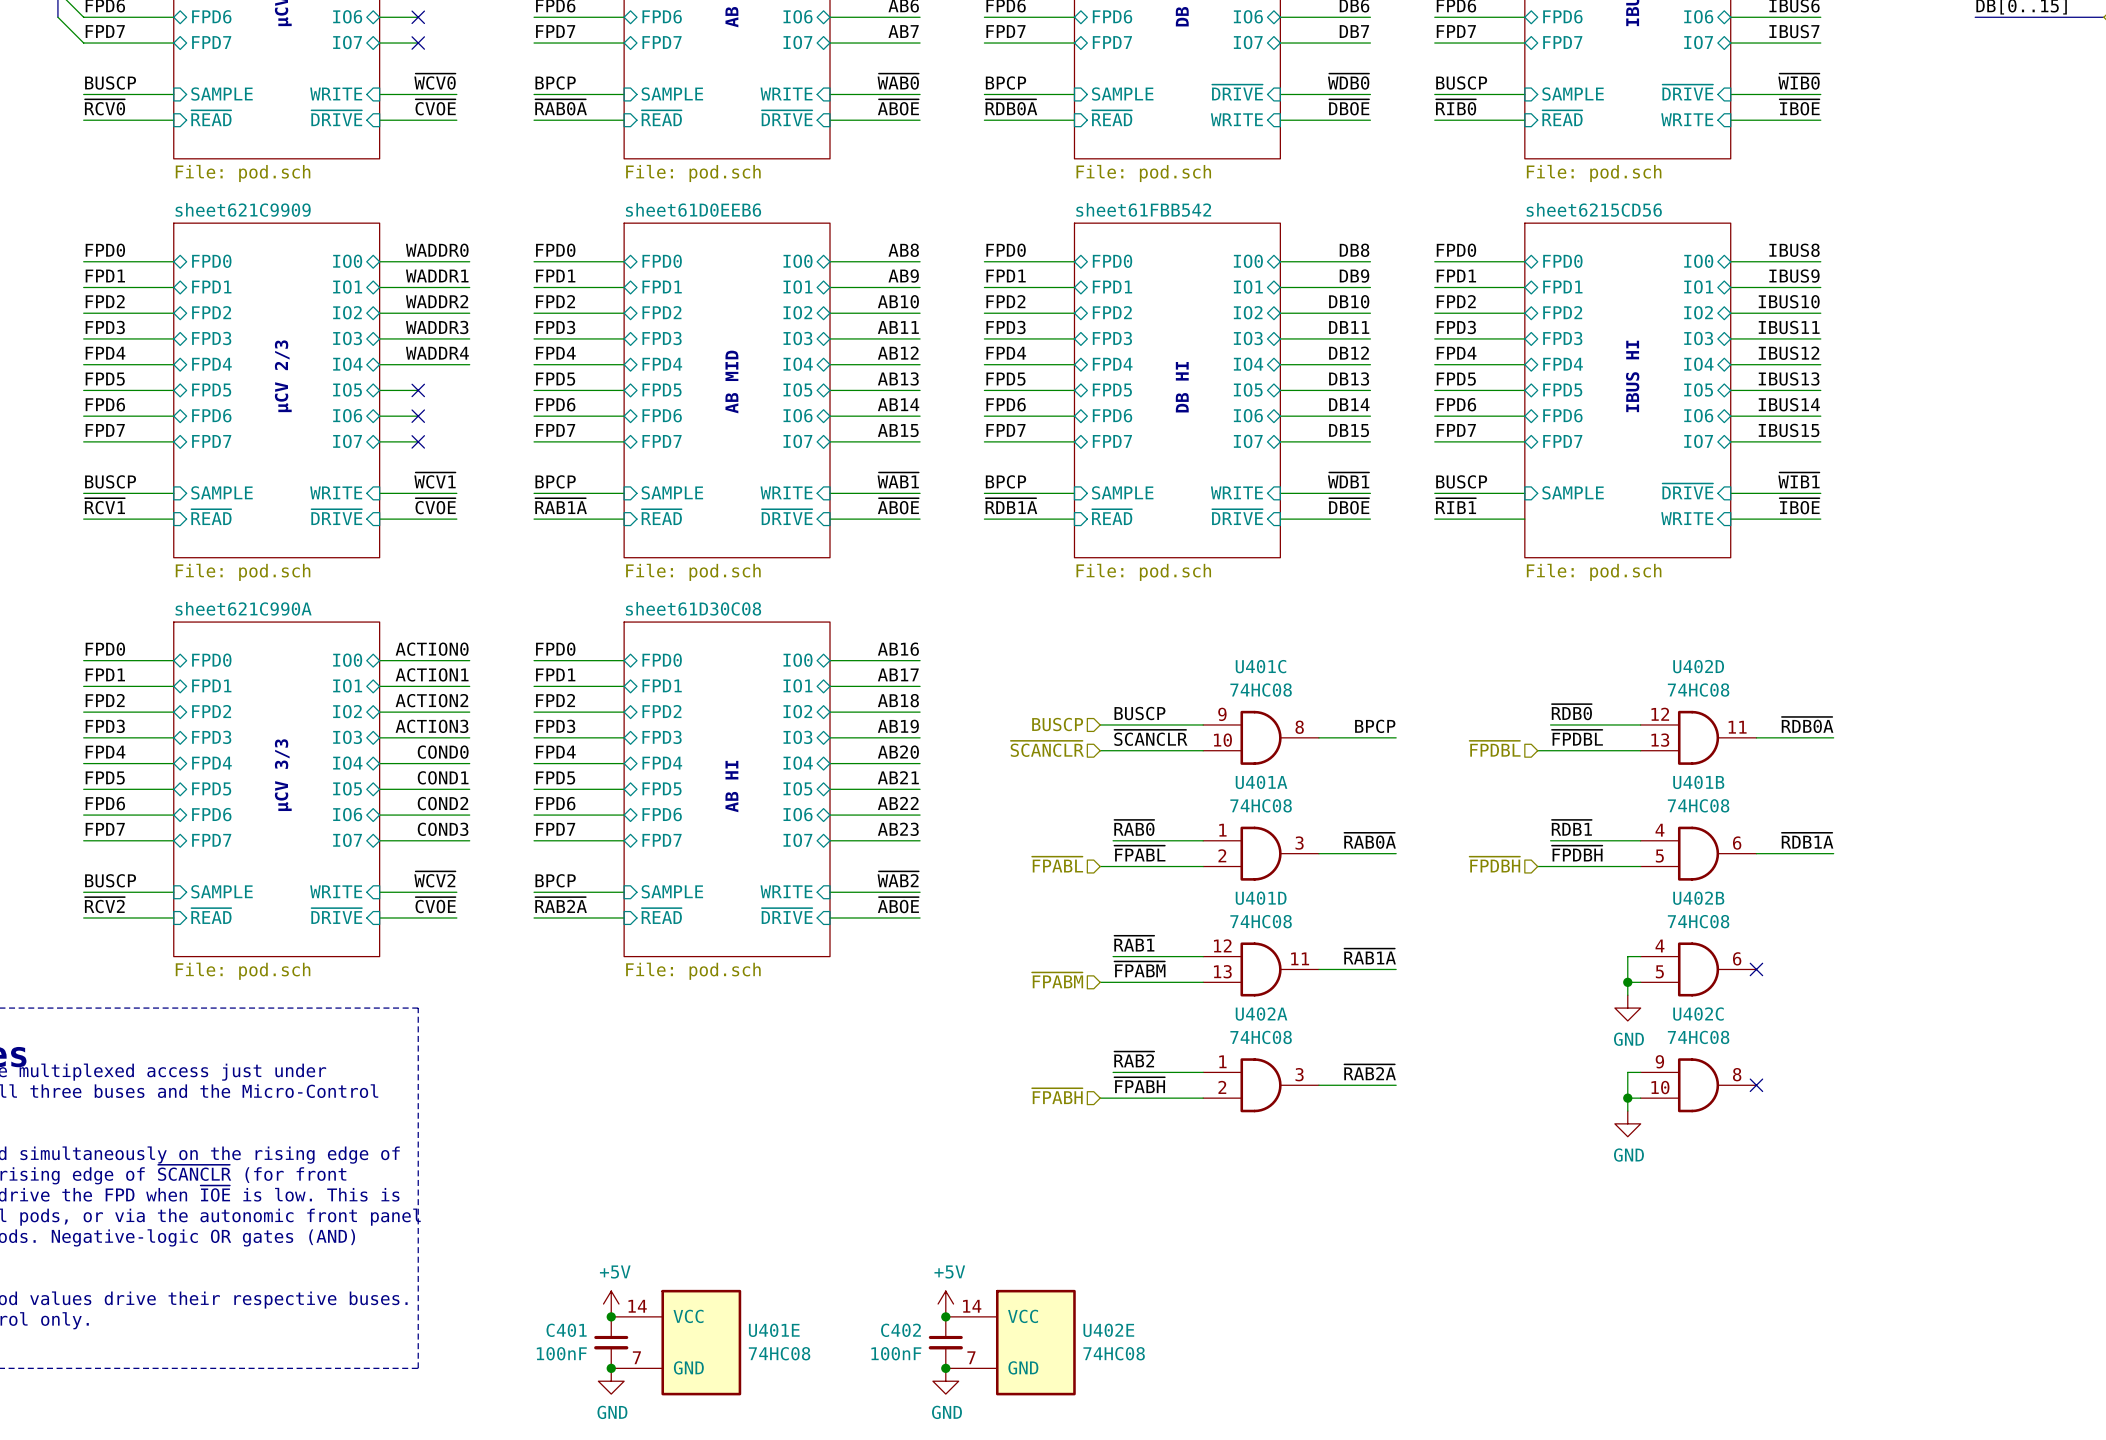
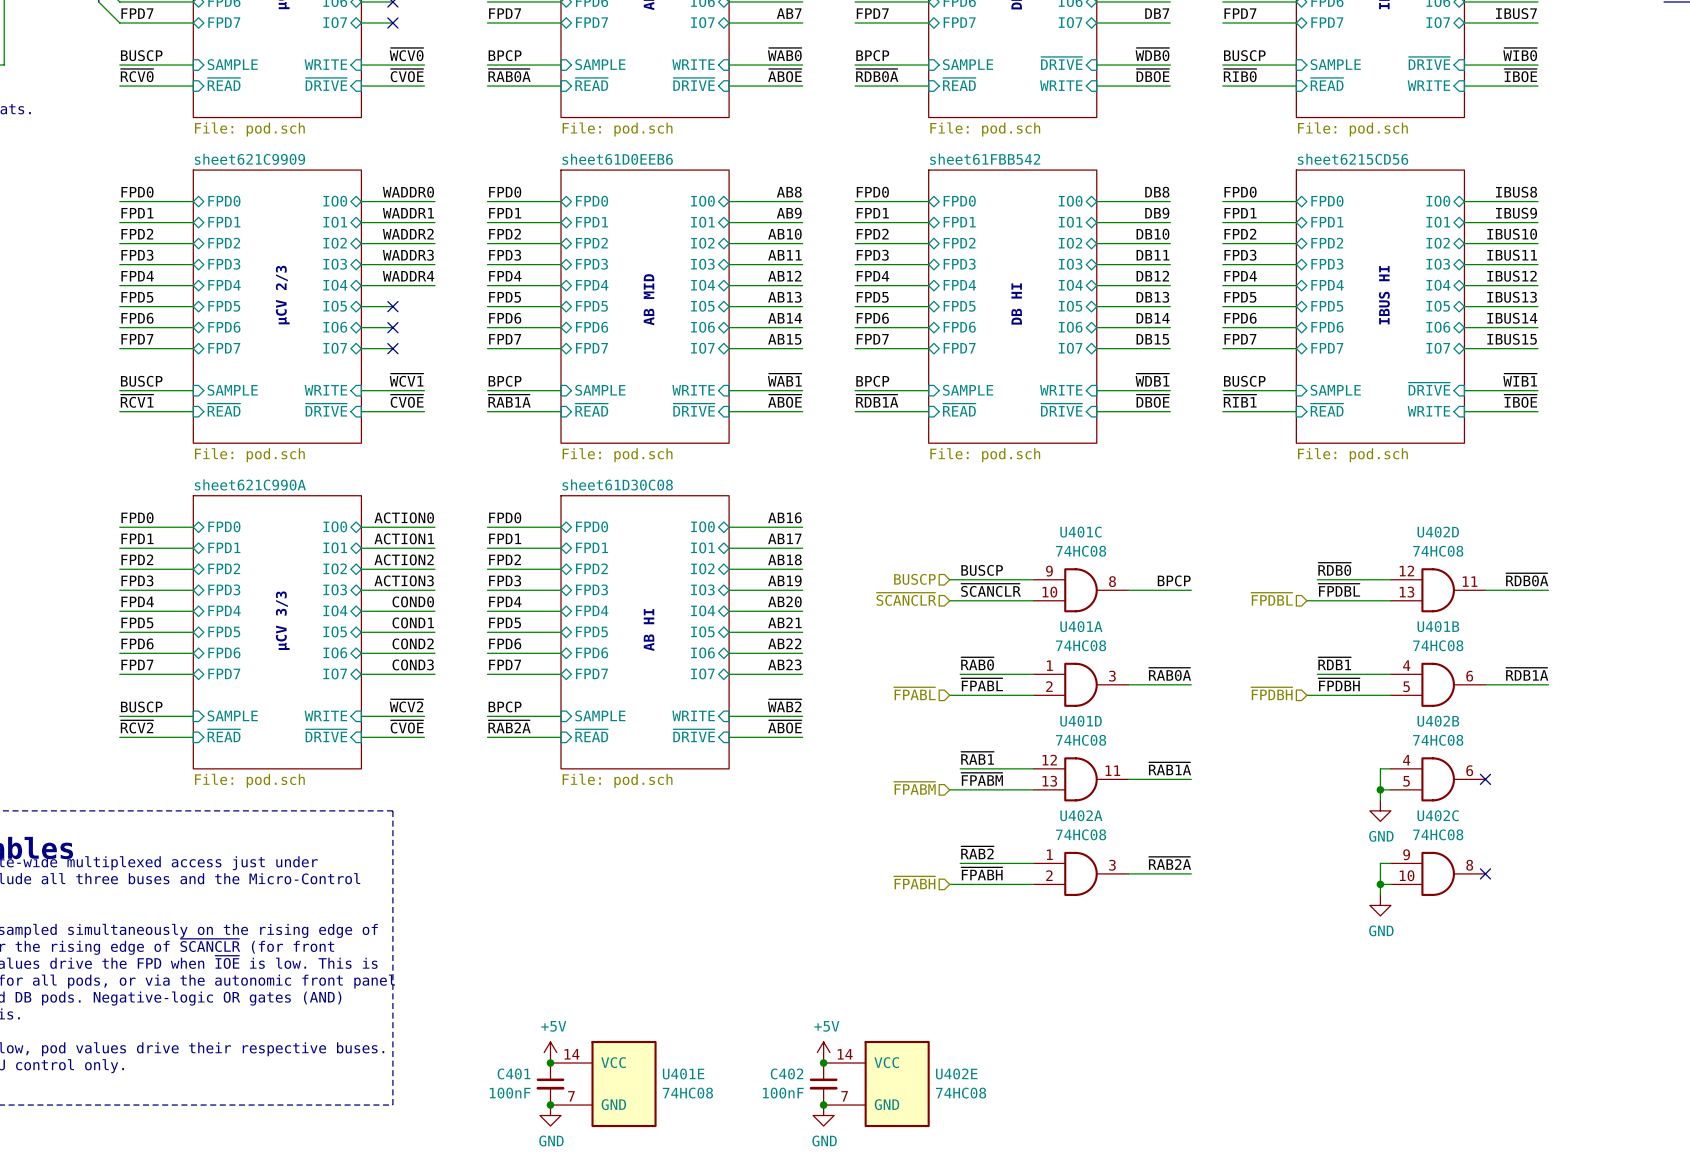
sheet pin: none -> ~{READ} (1327, 410)

